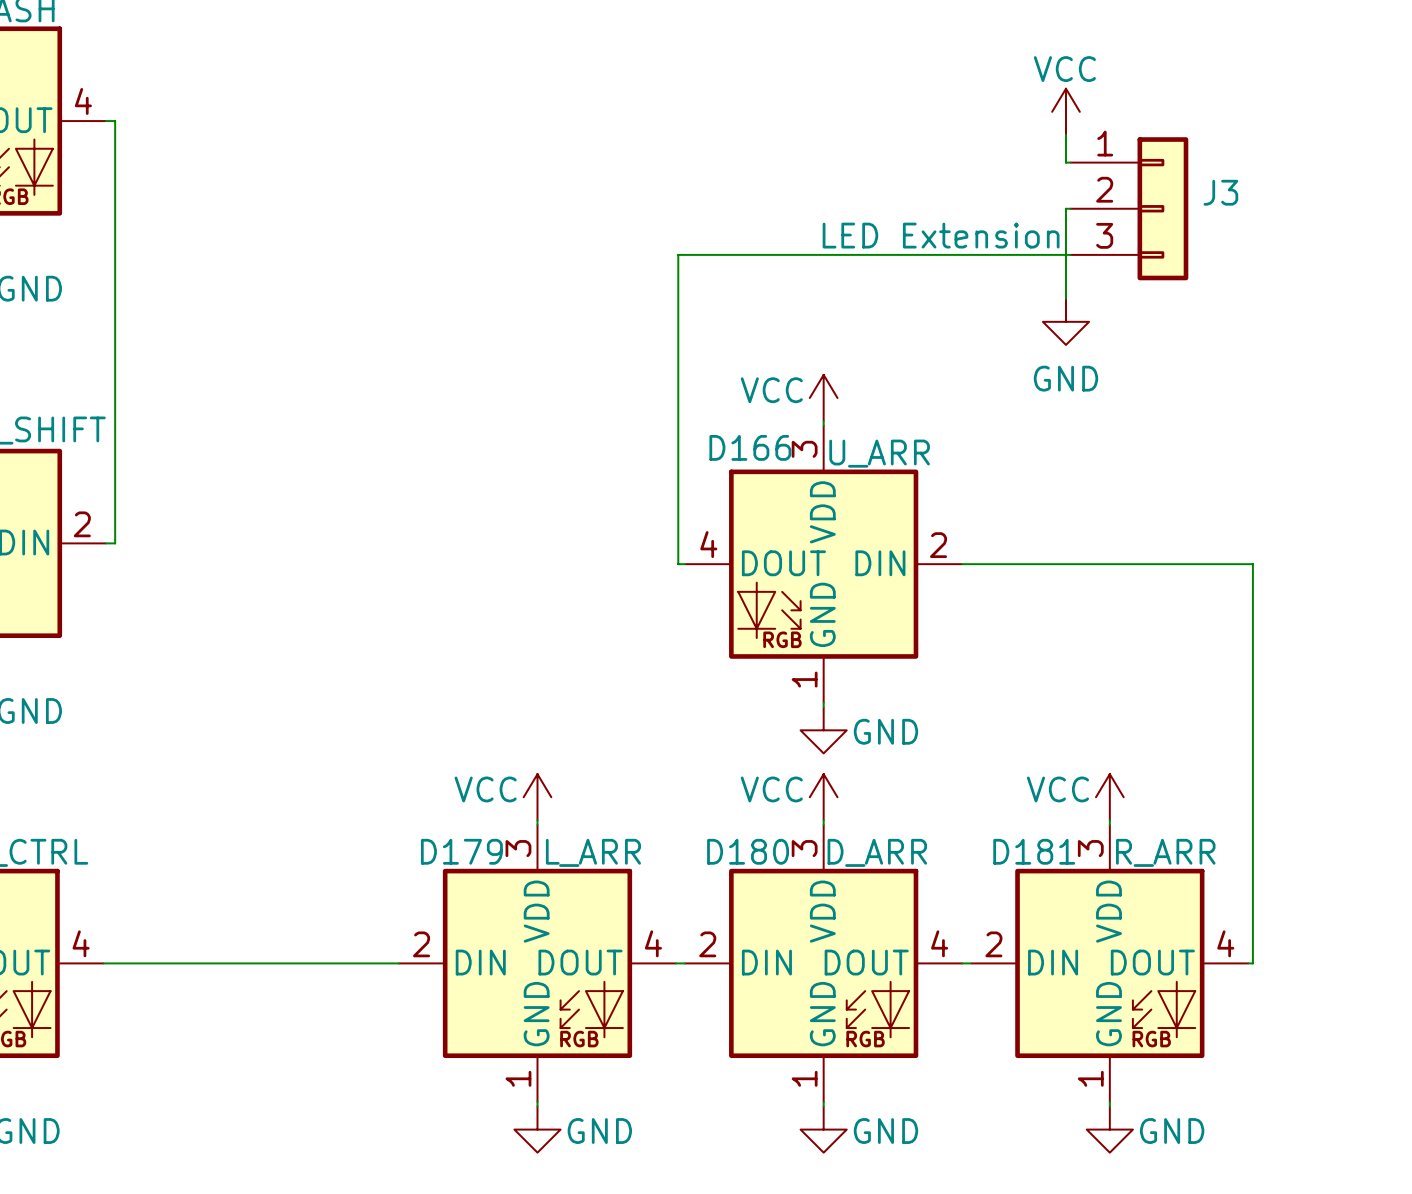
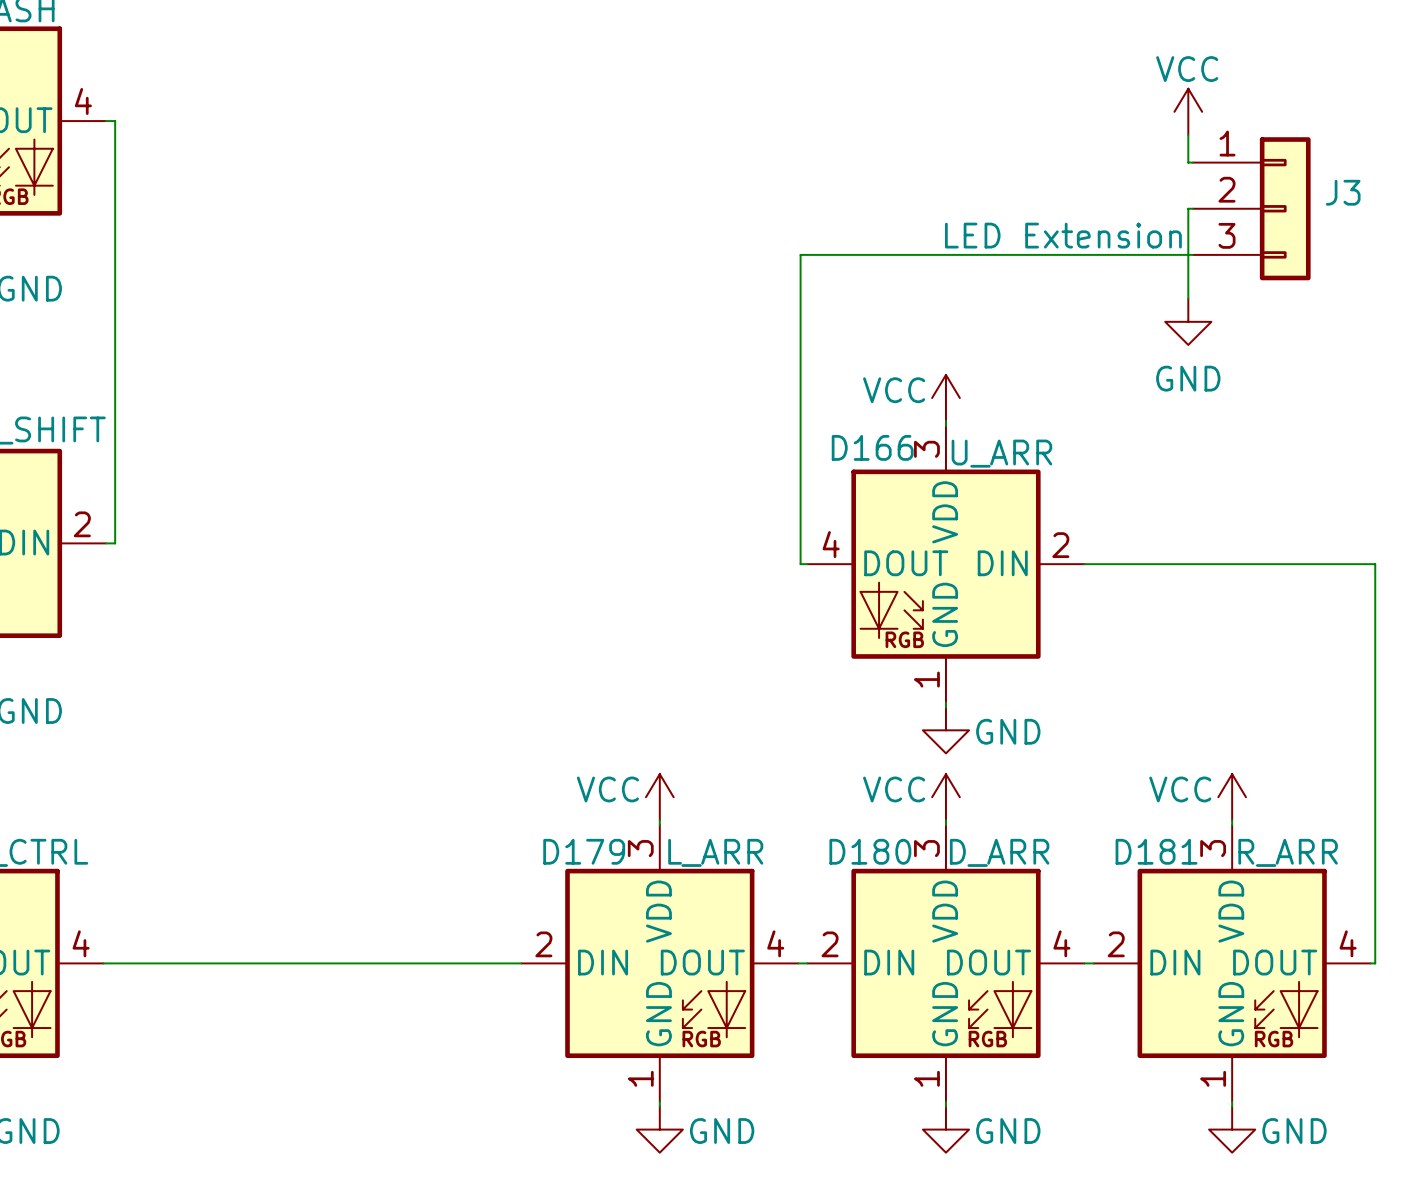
power symbol position: VCC (1065, 111) -> VCC (1188, 111)
wire: (1065, 134) (1065, 162) (1070, 162) -> (1188, 134) (1188, 162) (1192, 162)
wire: (1070, 208) (1065, 208) (1065, 298) -> (1192, 208) (1188, 208) (1188, 298)
J3 position: (1129, 208) -> (1251, 208)
wire: (800, 254) (678, 254) (678, 564) (685, 564) -> (800, 254) (800, 564) (807, 564)
power symbol position: GND (1065, 321) -> GND (1188, 321)
power symbol position: VCC (823, 397) -> VCC (945, 397)
wire: (823, 421) (823, 425) -> (945, 421) (945, 425)
D166 position: (823, 564) -> (945, 564)
wire: (1252, 564) (1252, 963) (1248, 963) -> (1252, 564) (1375, 564) (1375, 963) (1370, 963)
wire: (823, 702) (823, 707) -> (945, 702) (945, 707)
power symbol position: GND (823, 730) -> GND (945, 730)
power symbol: VCC (537, 797) -> none
power symbol: none -> VCC (659, 797)
power symbol: VCC (823, 797) -> none
power symbol: none -> VCC (945, 797)
power symbol: VCC (1109, 797) -> none
power symbol: none -> VCC (1232, 797)
wire: (537, 820) (537, 824) -> (659, 820) (659, 824)
wire: (823, 820) (823, 824) -> (945, 820) (945, 824)
wire: (1109, 820) (1109, 824) -> (1232, 820) (1232, 824)
D179 position: (537, 963) -> (659, 963)
D180 position: (823, 963) -> (945, 963)
D181 position: (1109, 963) -> (1232, 963)
wire: (537, 1101) (537, 1106) -> (659, 1101) (659, 1106)
wire: (823, 1101) (823, 1106) -> (945, 1101) (945, 1106)
wire: (1109, 1101) (1109, 1106) -> (1232, 1101) (1232, 1106)
power symbol: GND (537, 1129) -> none
power symbol: none -> GND (659, 1129)
power symbol: GND (823, 1129) -> none
power symbol: none -> GND (945, 1129)
power symbol: GND (1109, 1129) -> none
power symbol: none -> GND (1232, 1129)

